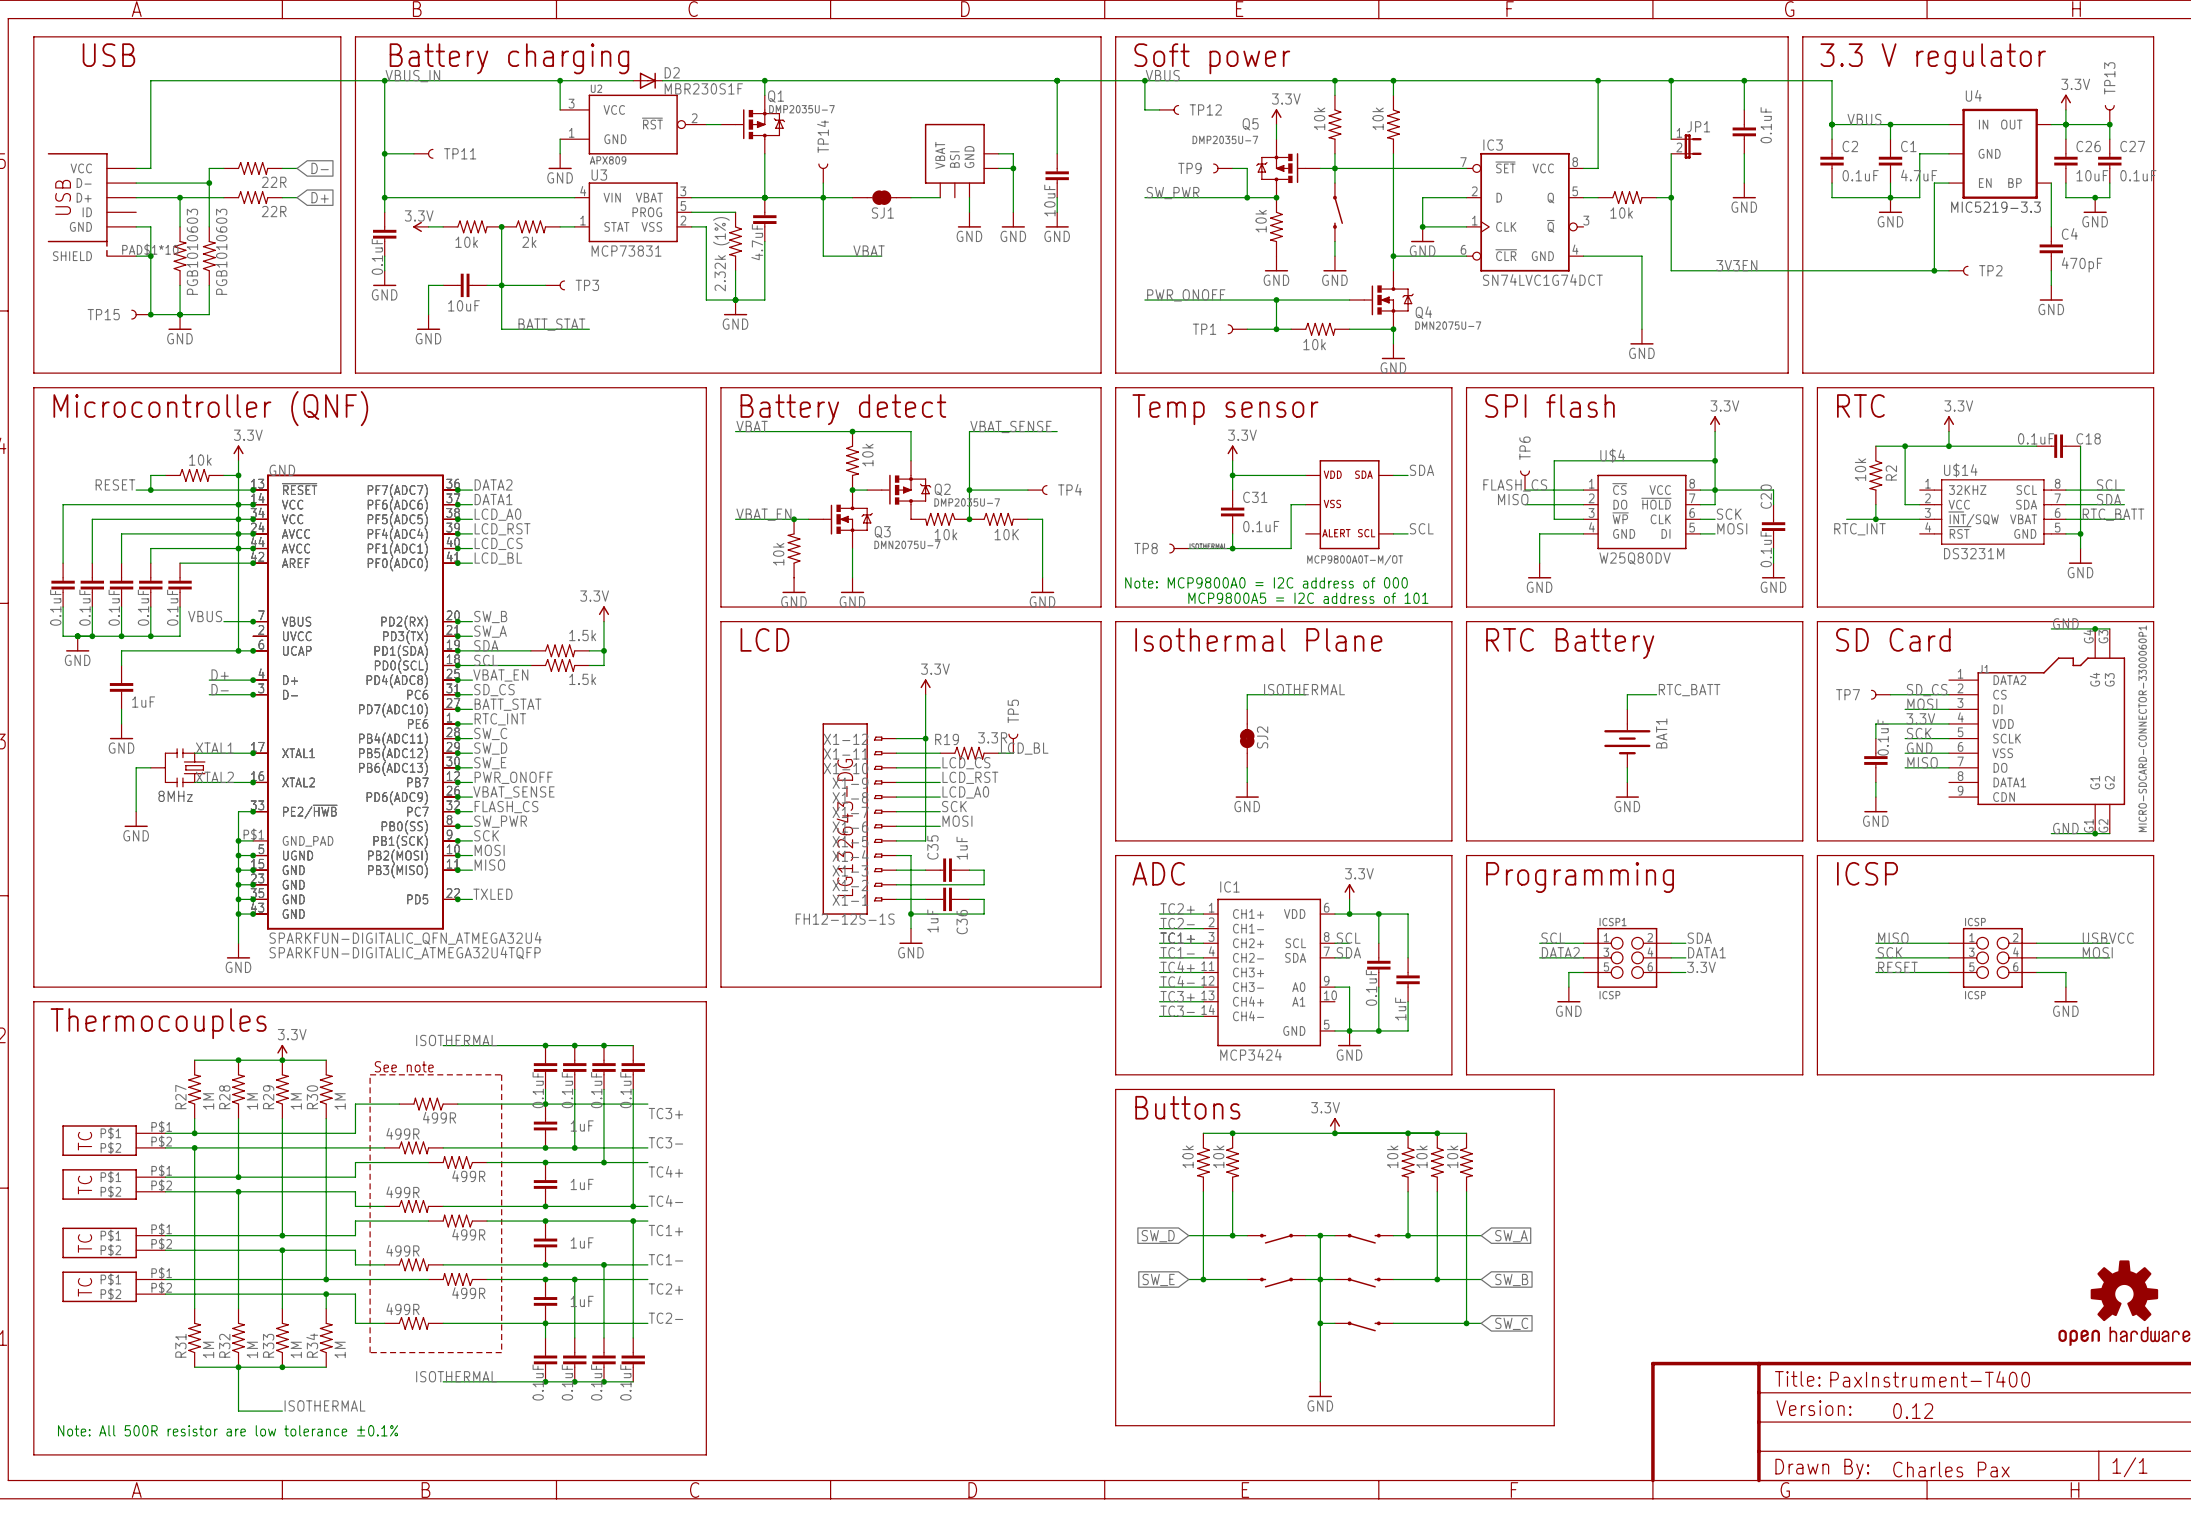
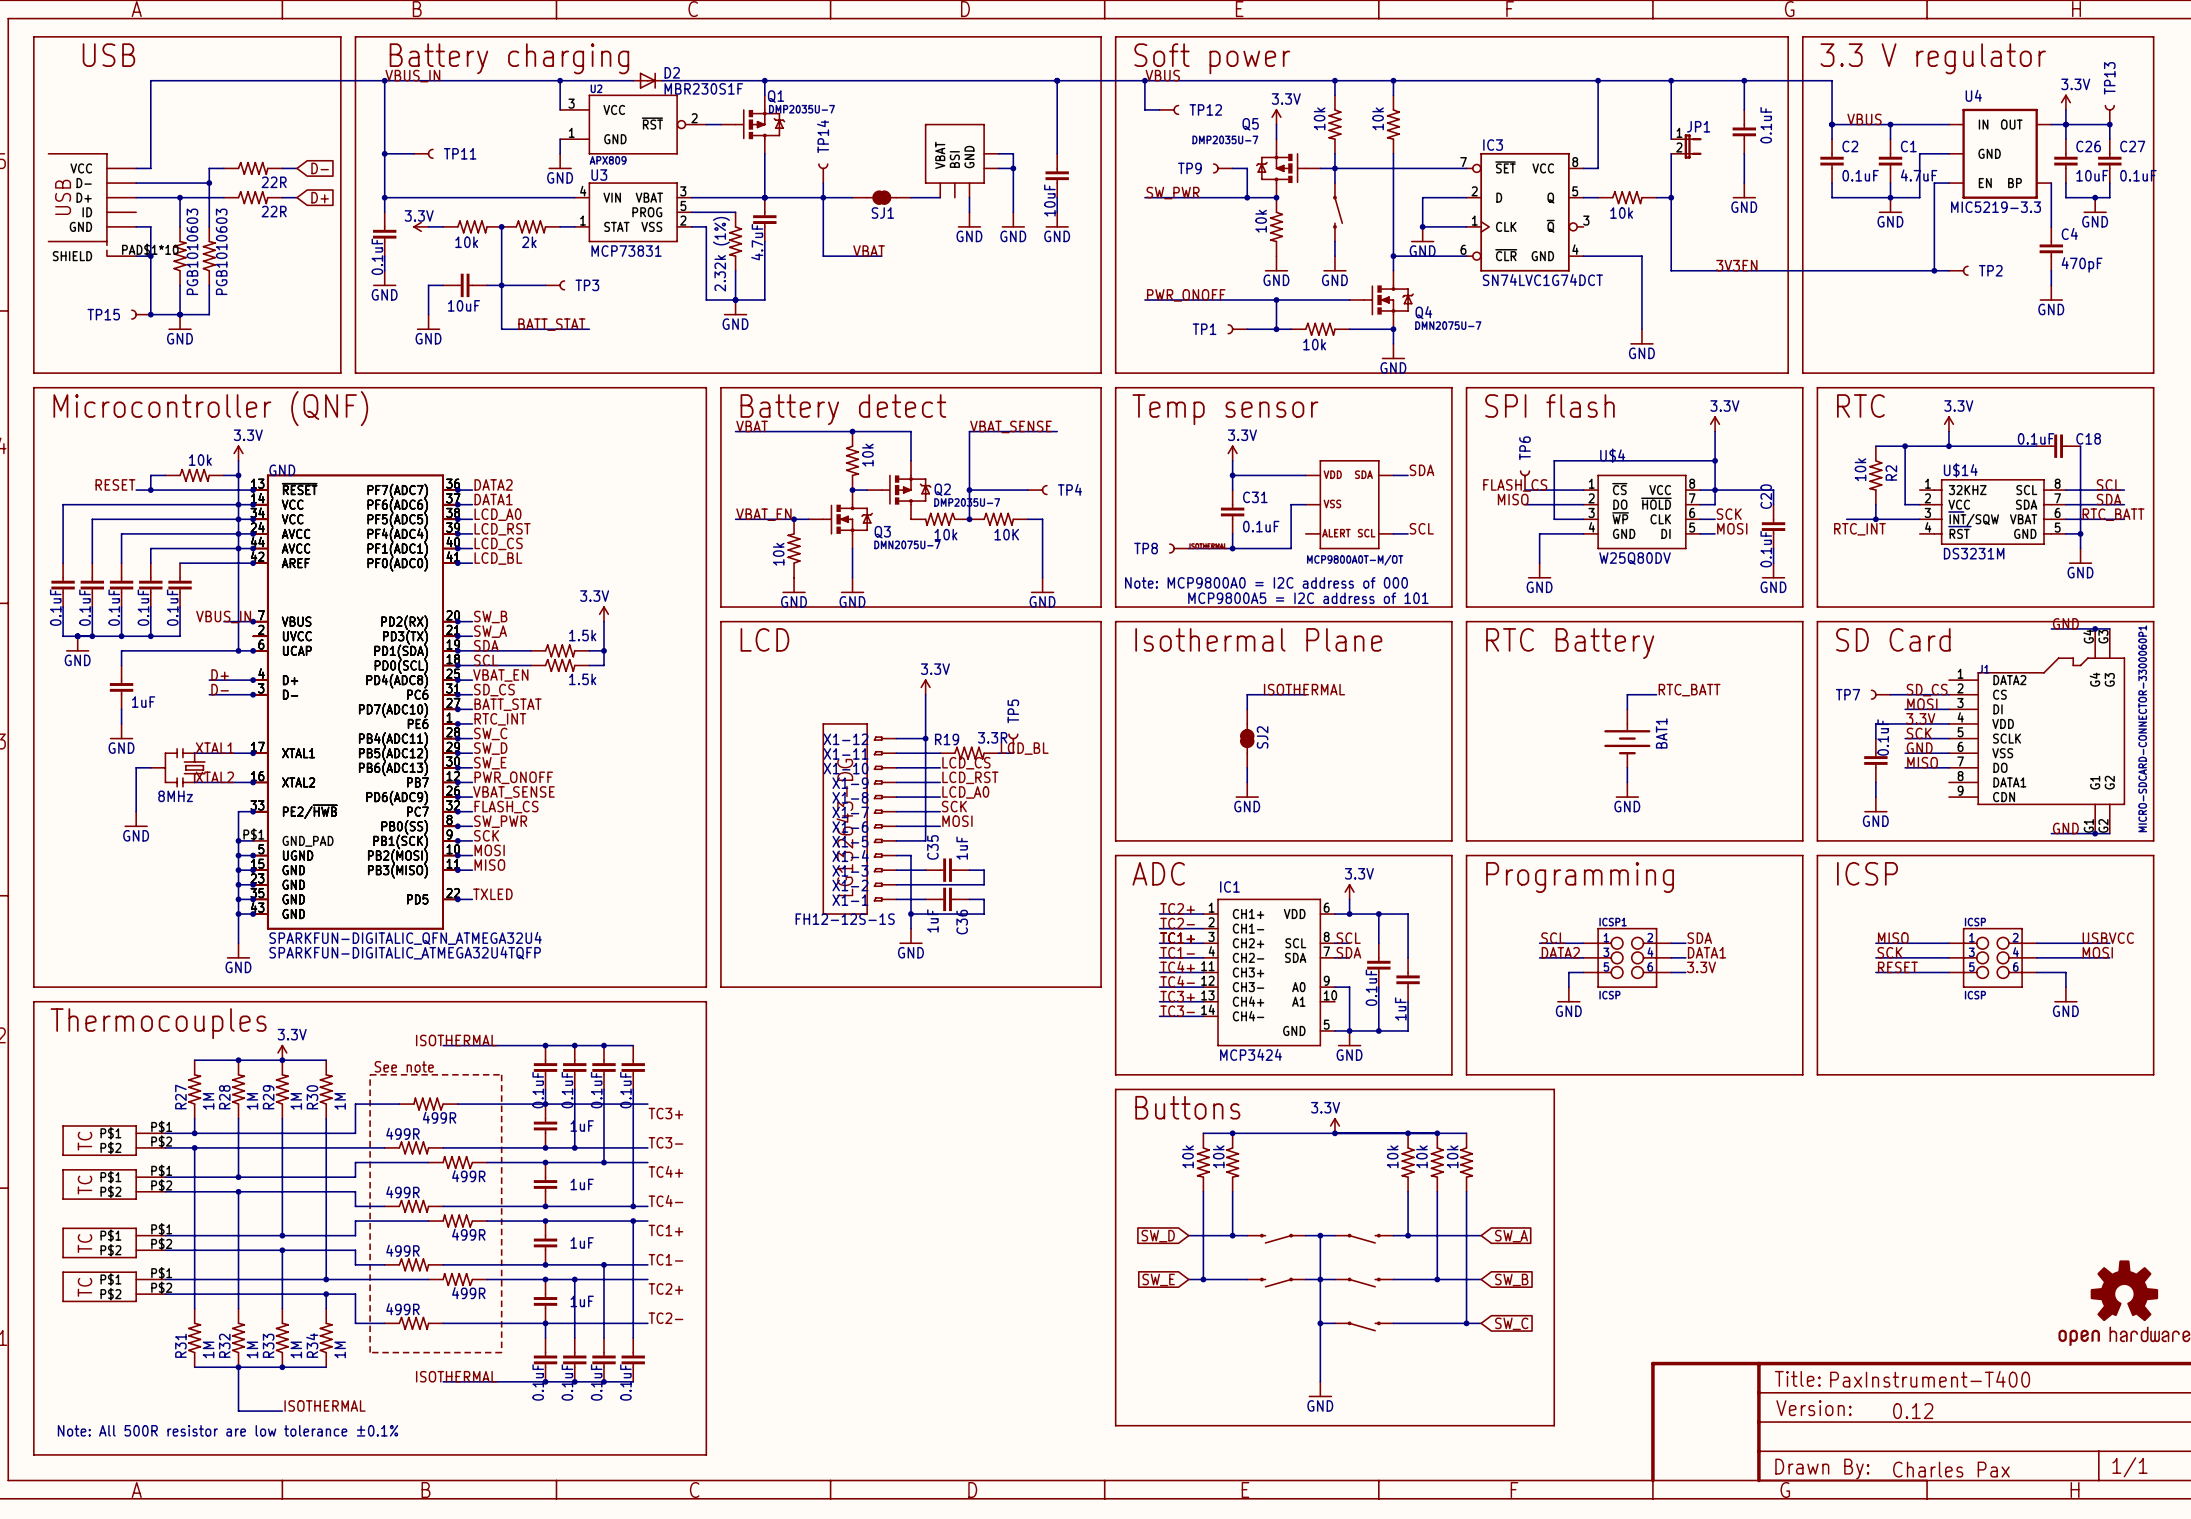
label: VBUS (205, 616) -> VBUS_IN (223, 617)

